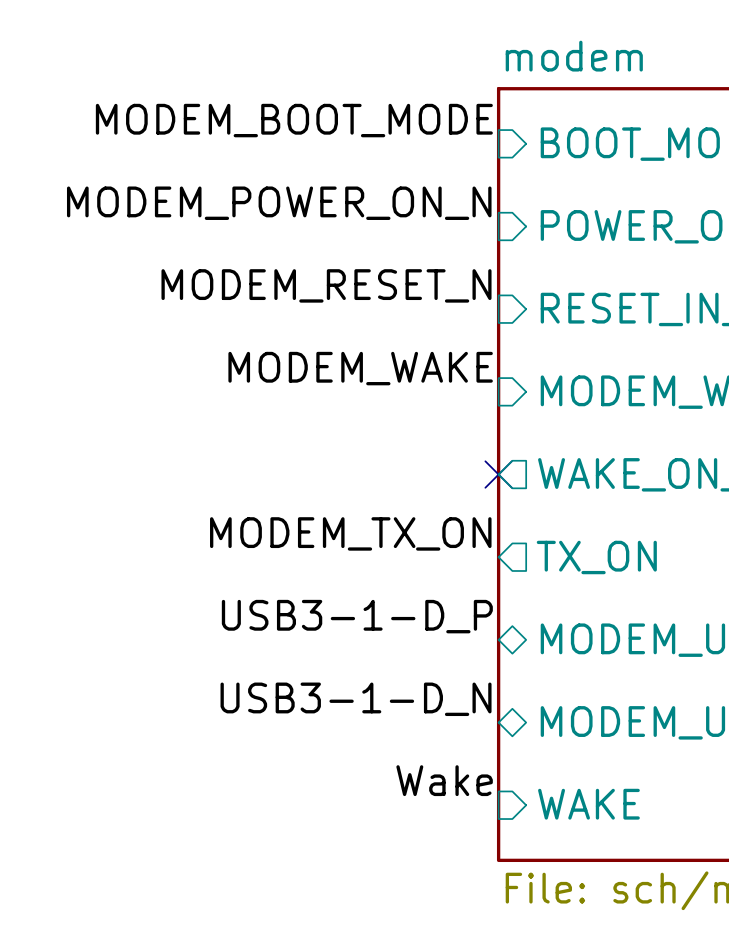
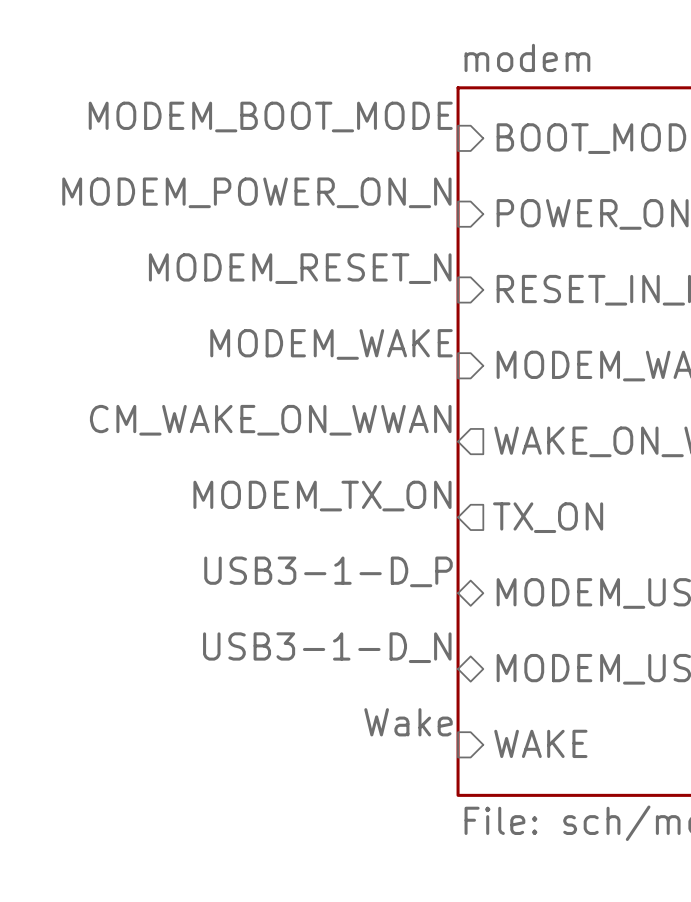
label: none -> CM_WAKE_ON_WWAN (270, 420)
no-connect mark: (498, 474) -> none

